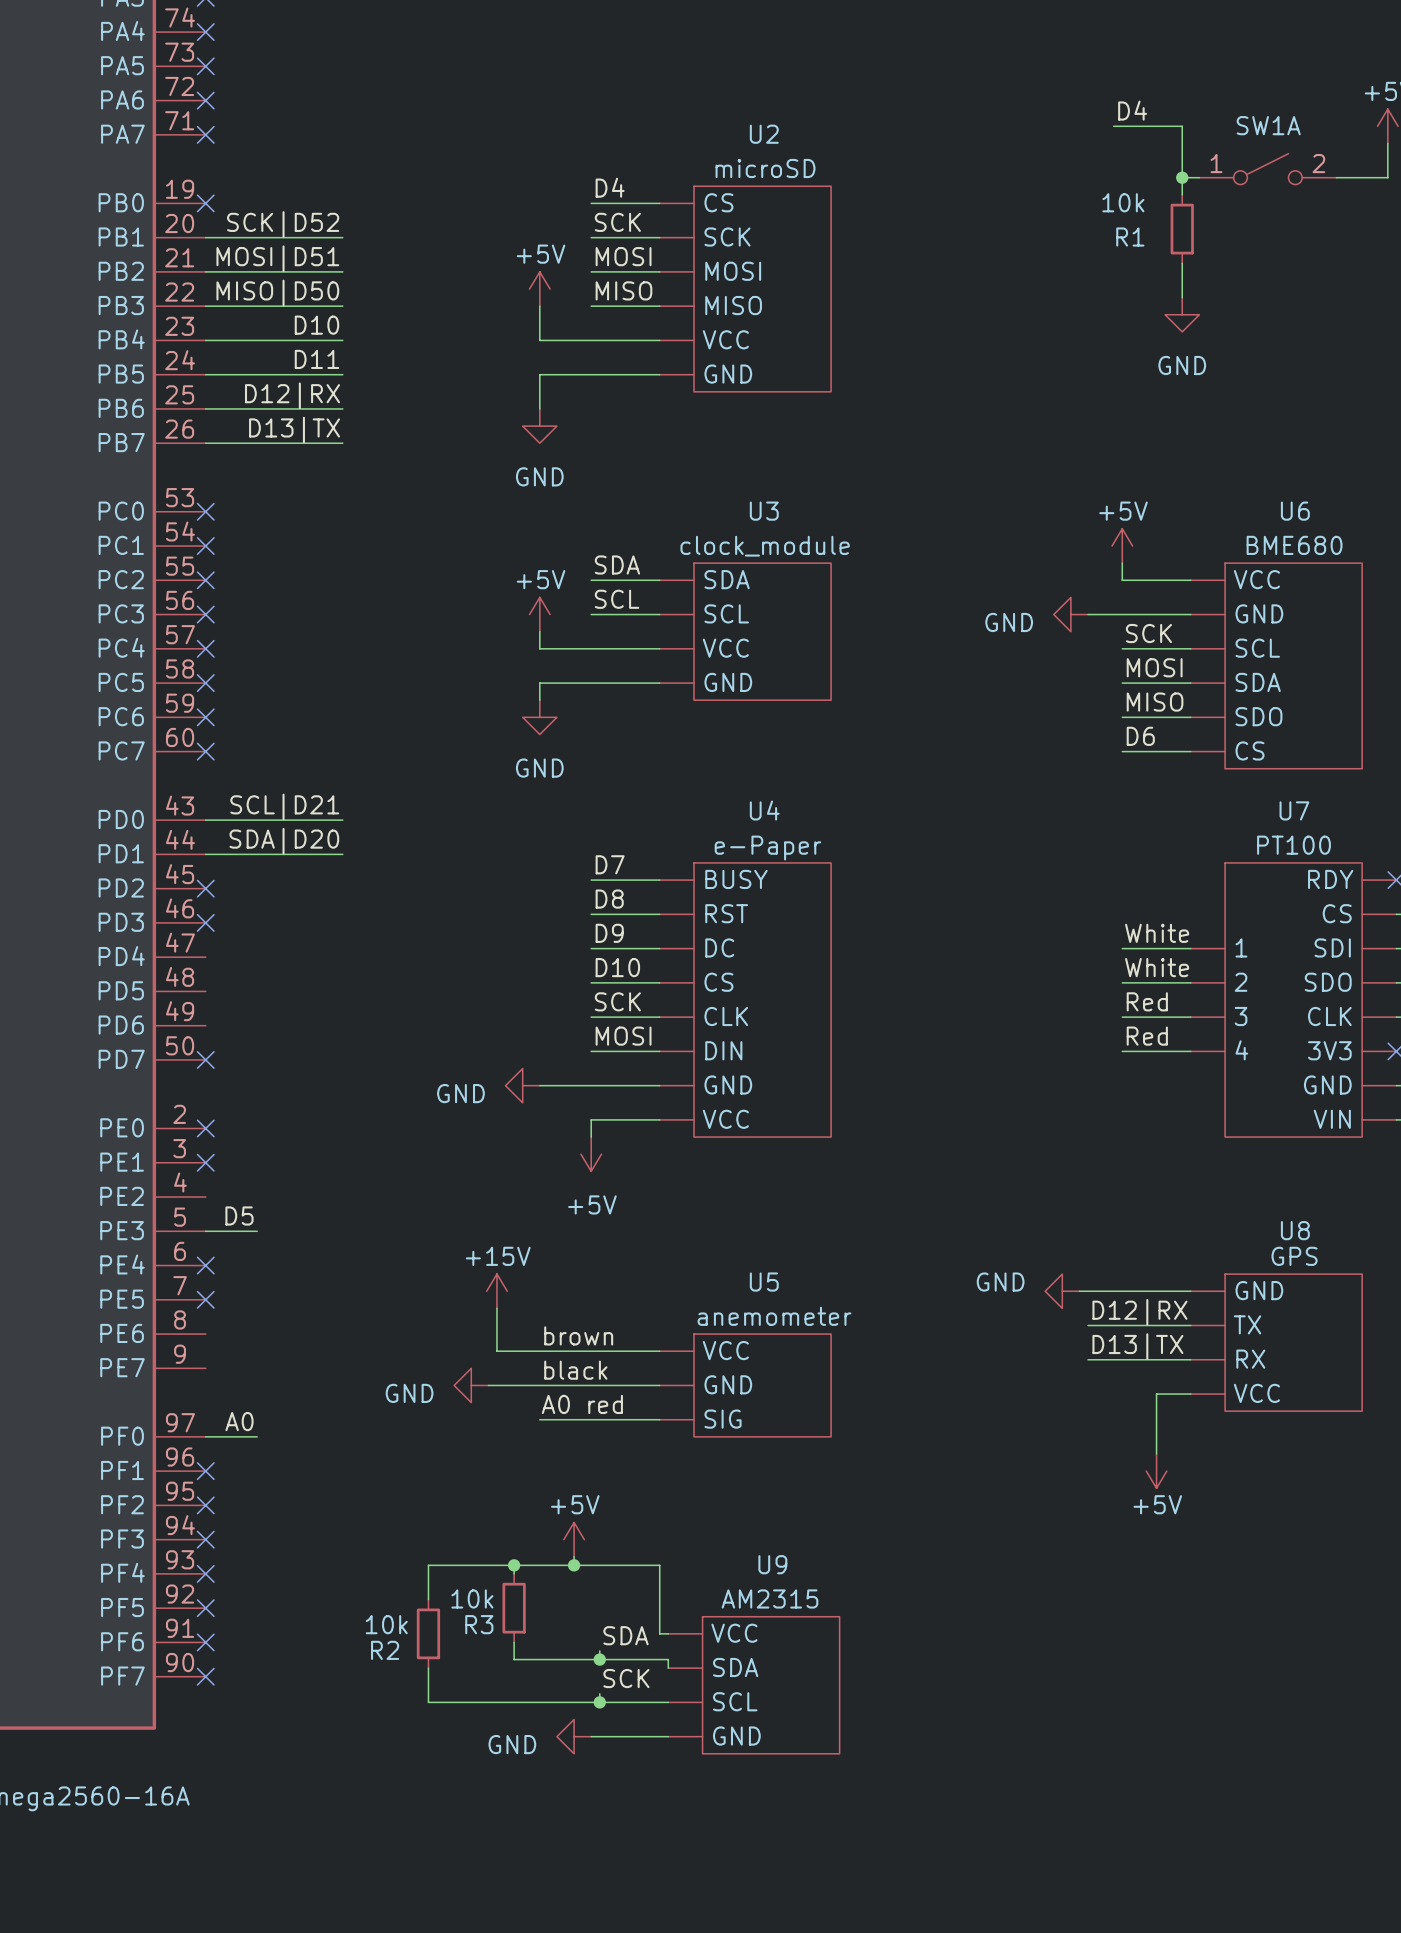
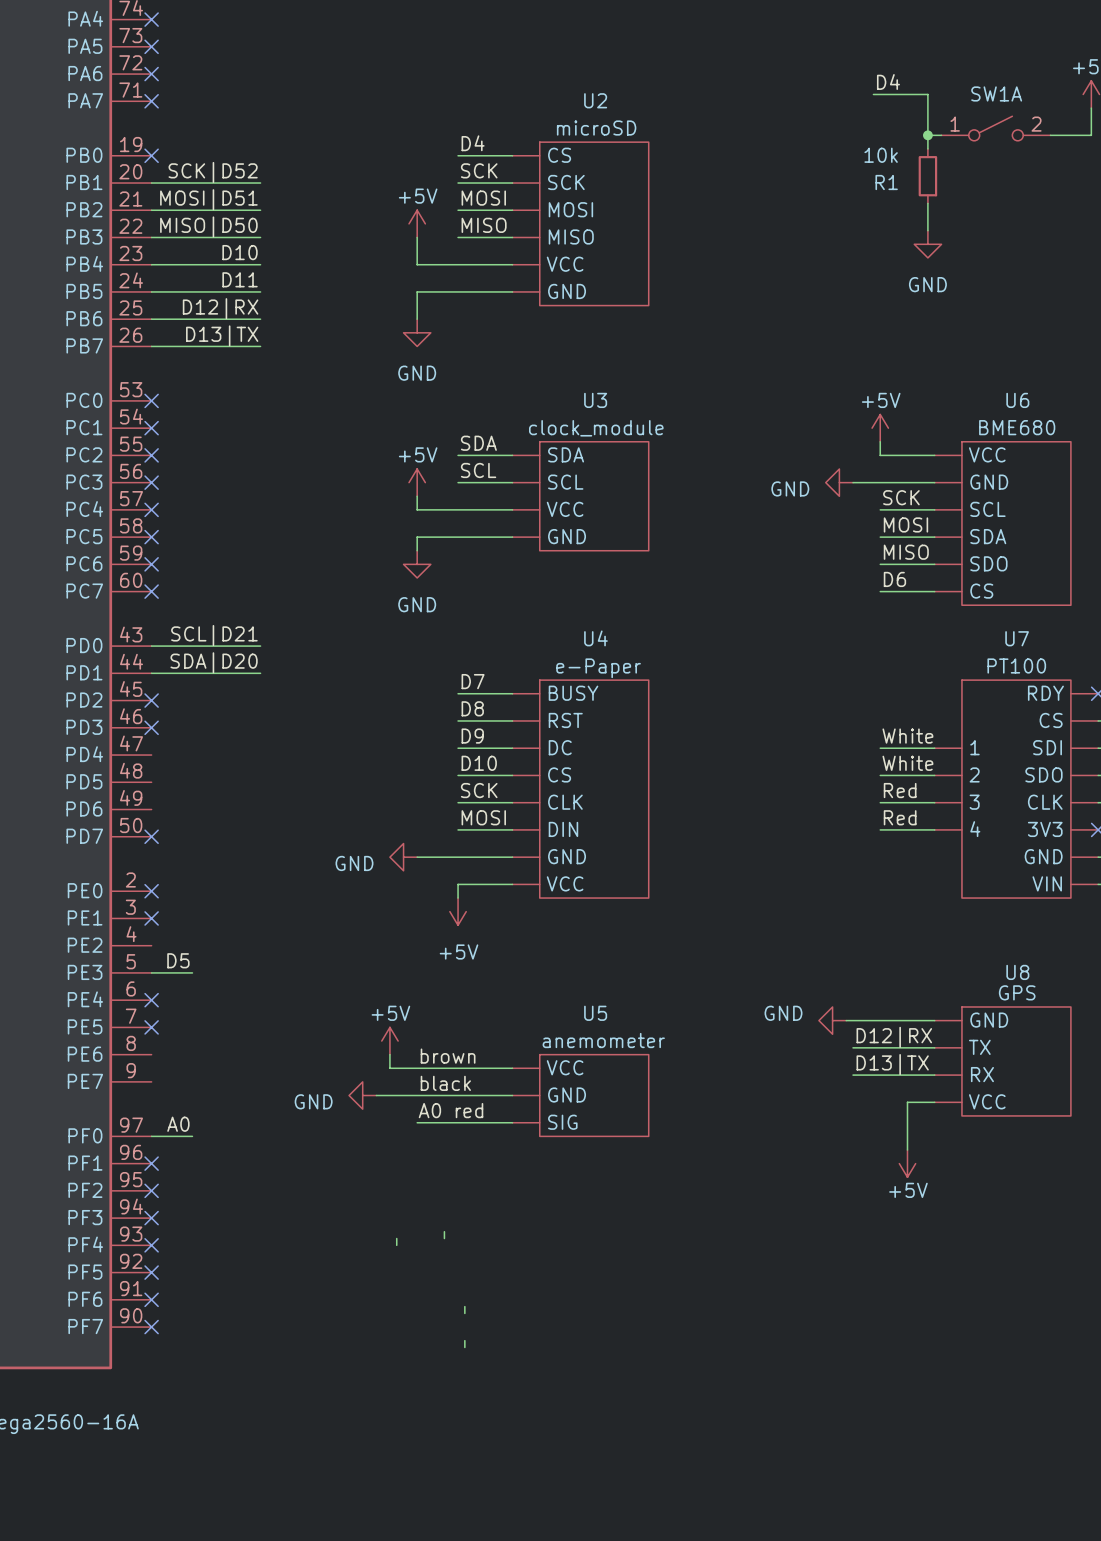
power symbol: +15V (496, 1291) -> none
wire: (496, 1308) (496, 1351) (505, 1351) -> (389, 1054) (389, 1068)
power symbol position: +5V (574, 1539) -> +5V (389, 1041)
junction: (514, 1565) -> none
junction: (574, 1565) -> none
wire: (428, 1599) (428, 1565) (659, 1565) (659, 1633) (668, 1633) -> none
R3: 10k (514, 1608) -> none
R2: 10k (428, 1633) -> none
label: SDA (626, 1635) -> none
wire: (514, 1642) (514, 1659) (668, 1659) (668, 1668) -> none
junction: (599, 1659) -> none
wire: (428, 1668) (428, 1702) (668, 1702) -> none
label: SCK (626, 1678) -> none
U9: AM2315 (753, 1685) -> none
junction: (599, 1702) -> none
power symbol: GND (574, 1736) -> none
wire: (591, 1736) (668, 1736) -> none

